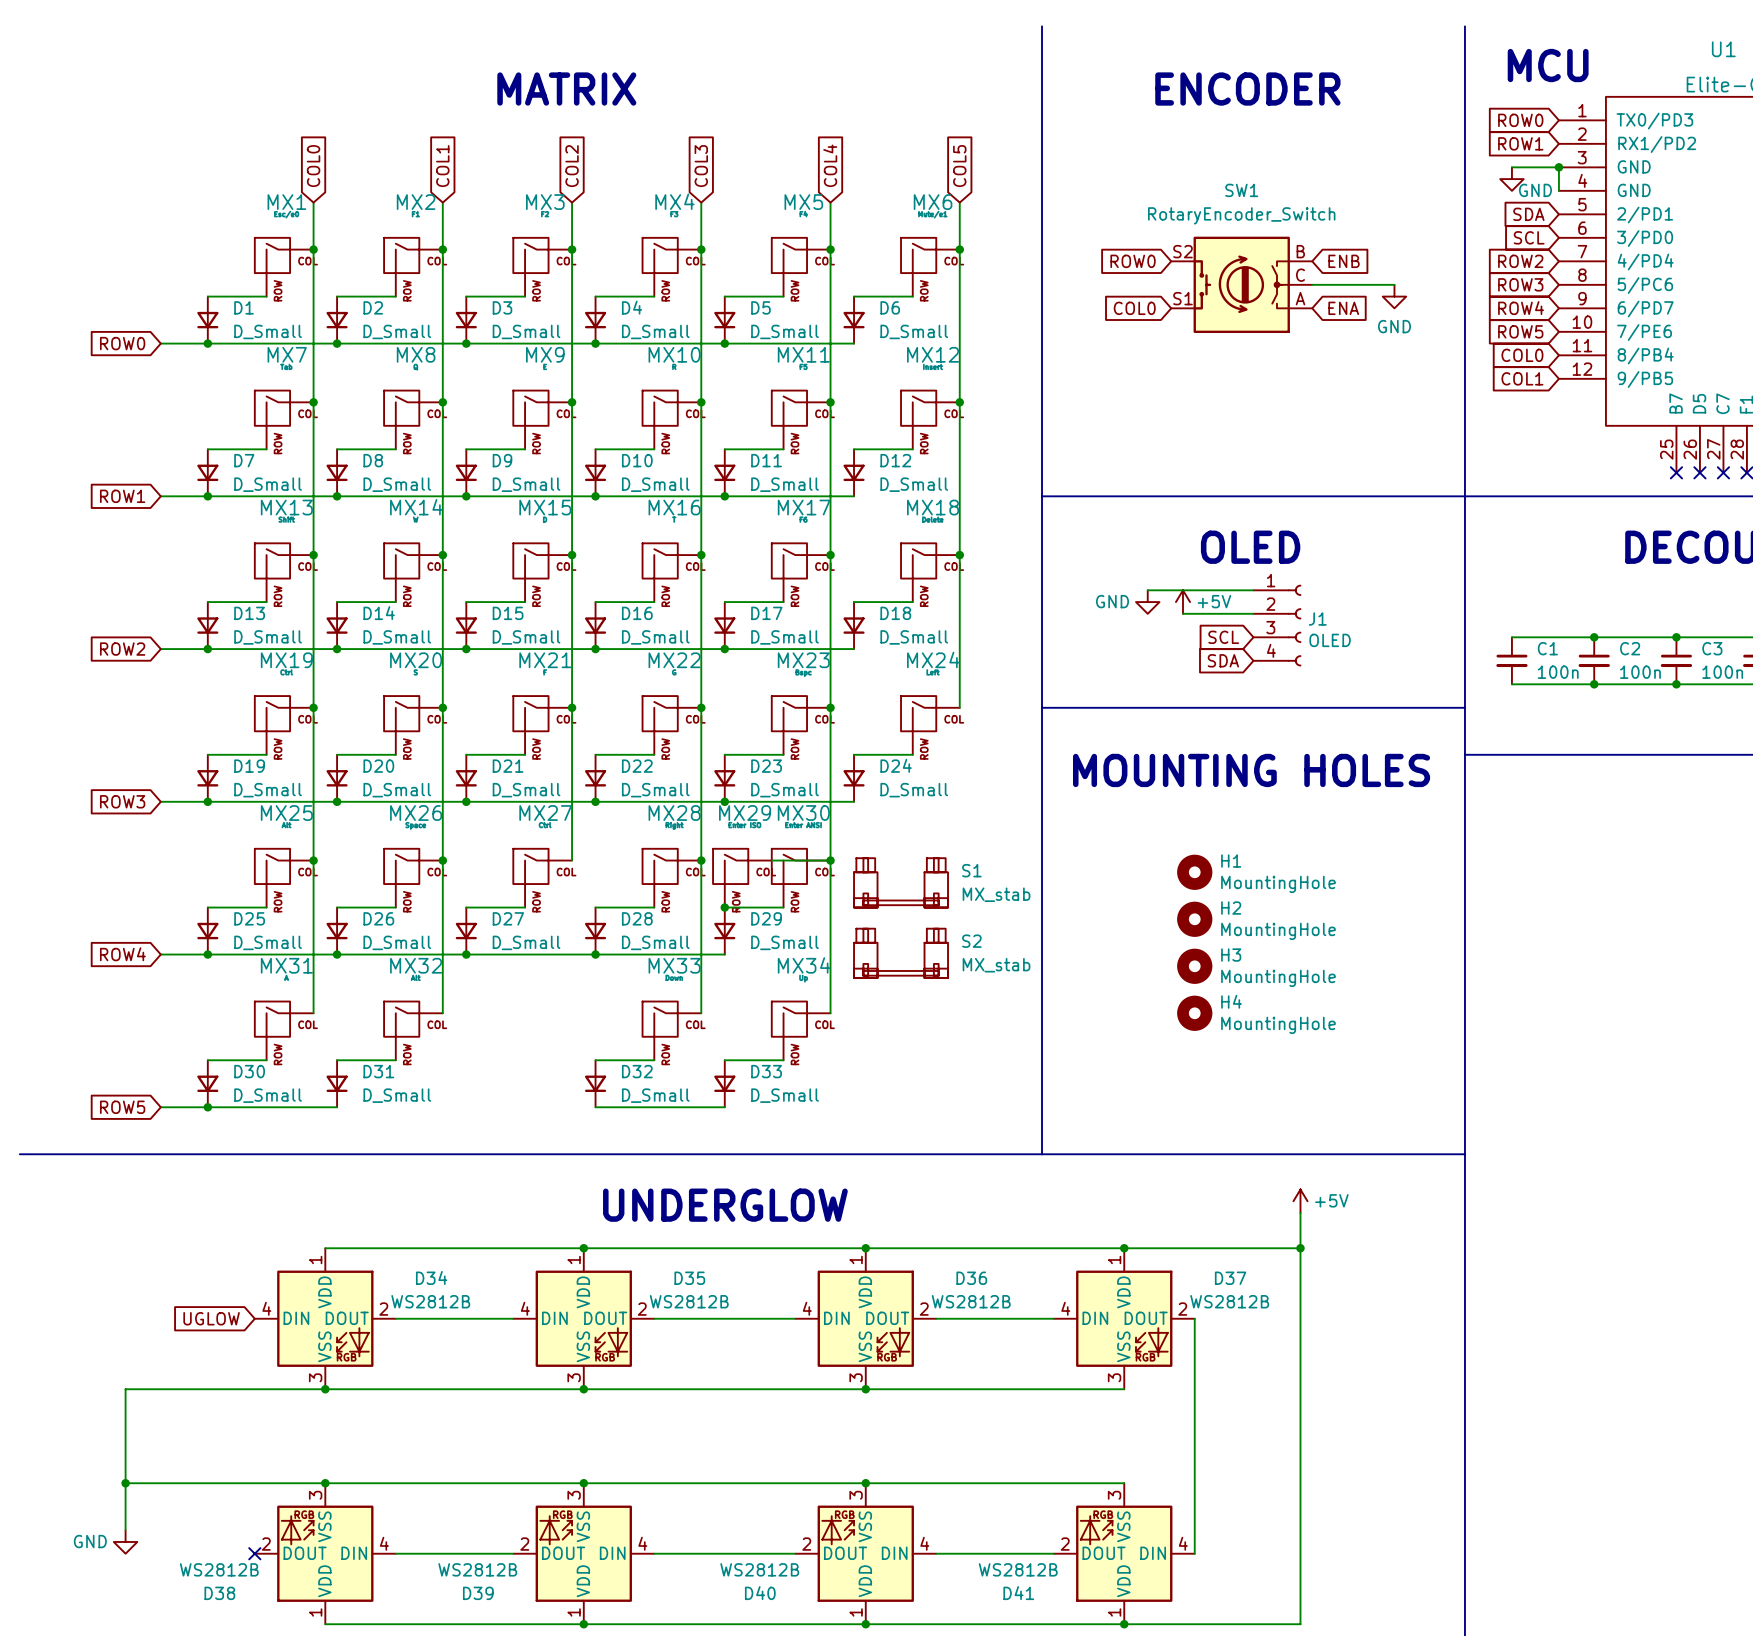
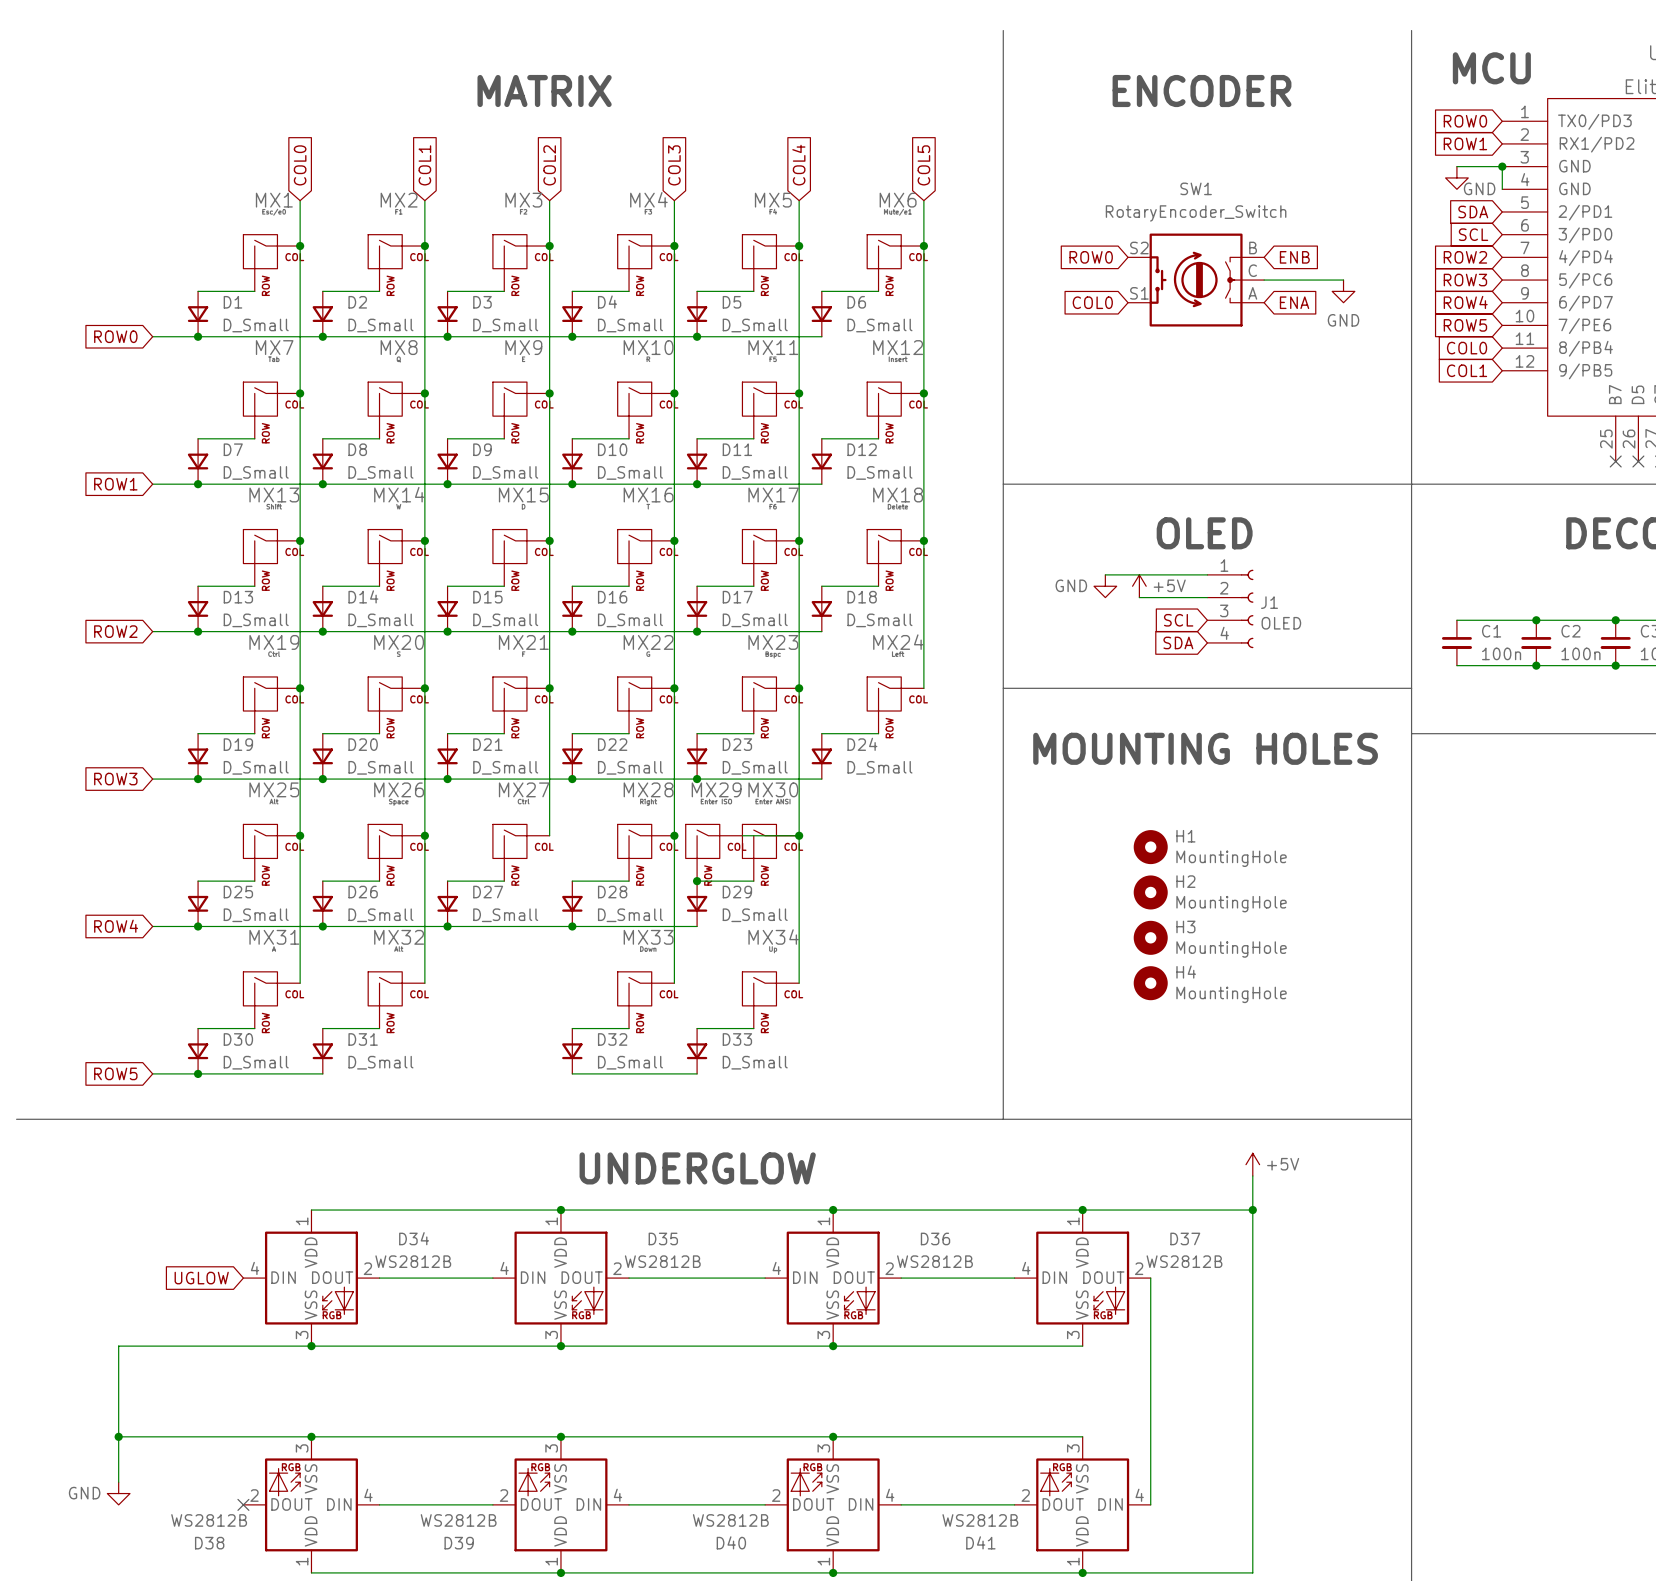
S1: MX_stab (901, 882) -> none
S2: MX_stab (901, 953) -> none

